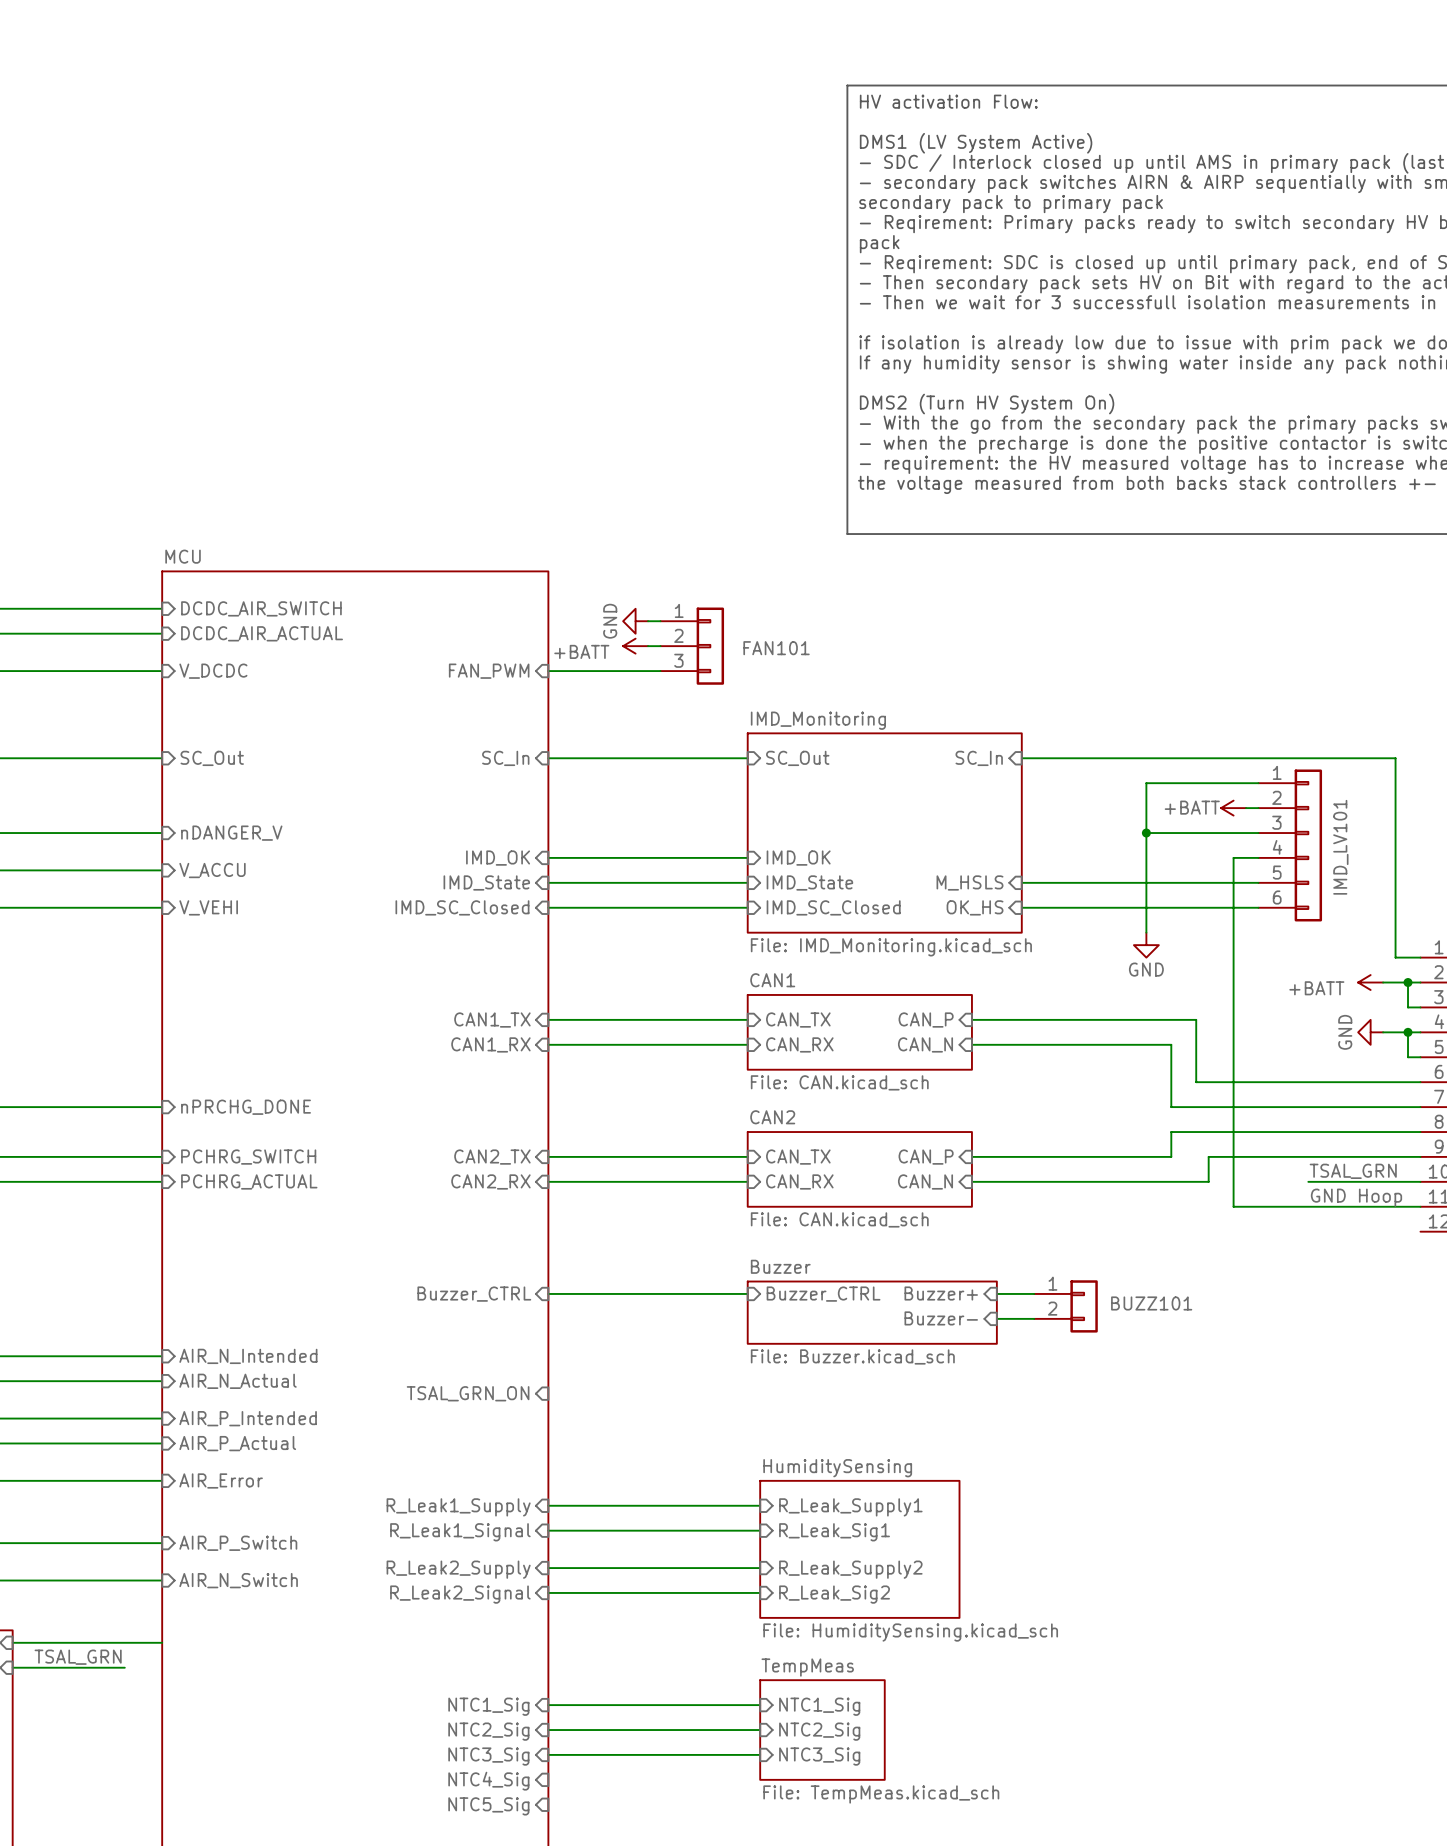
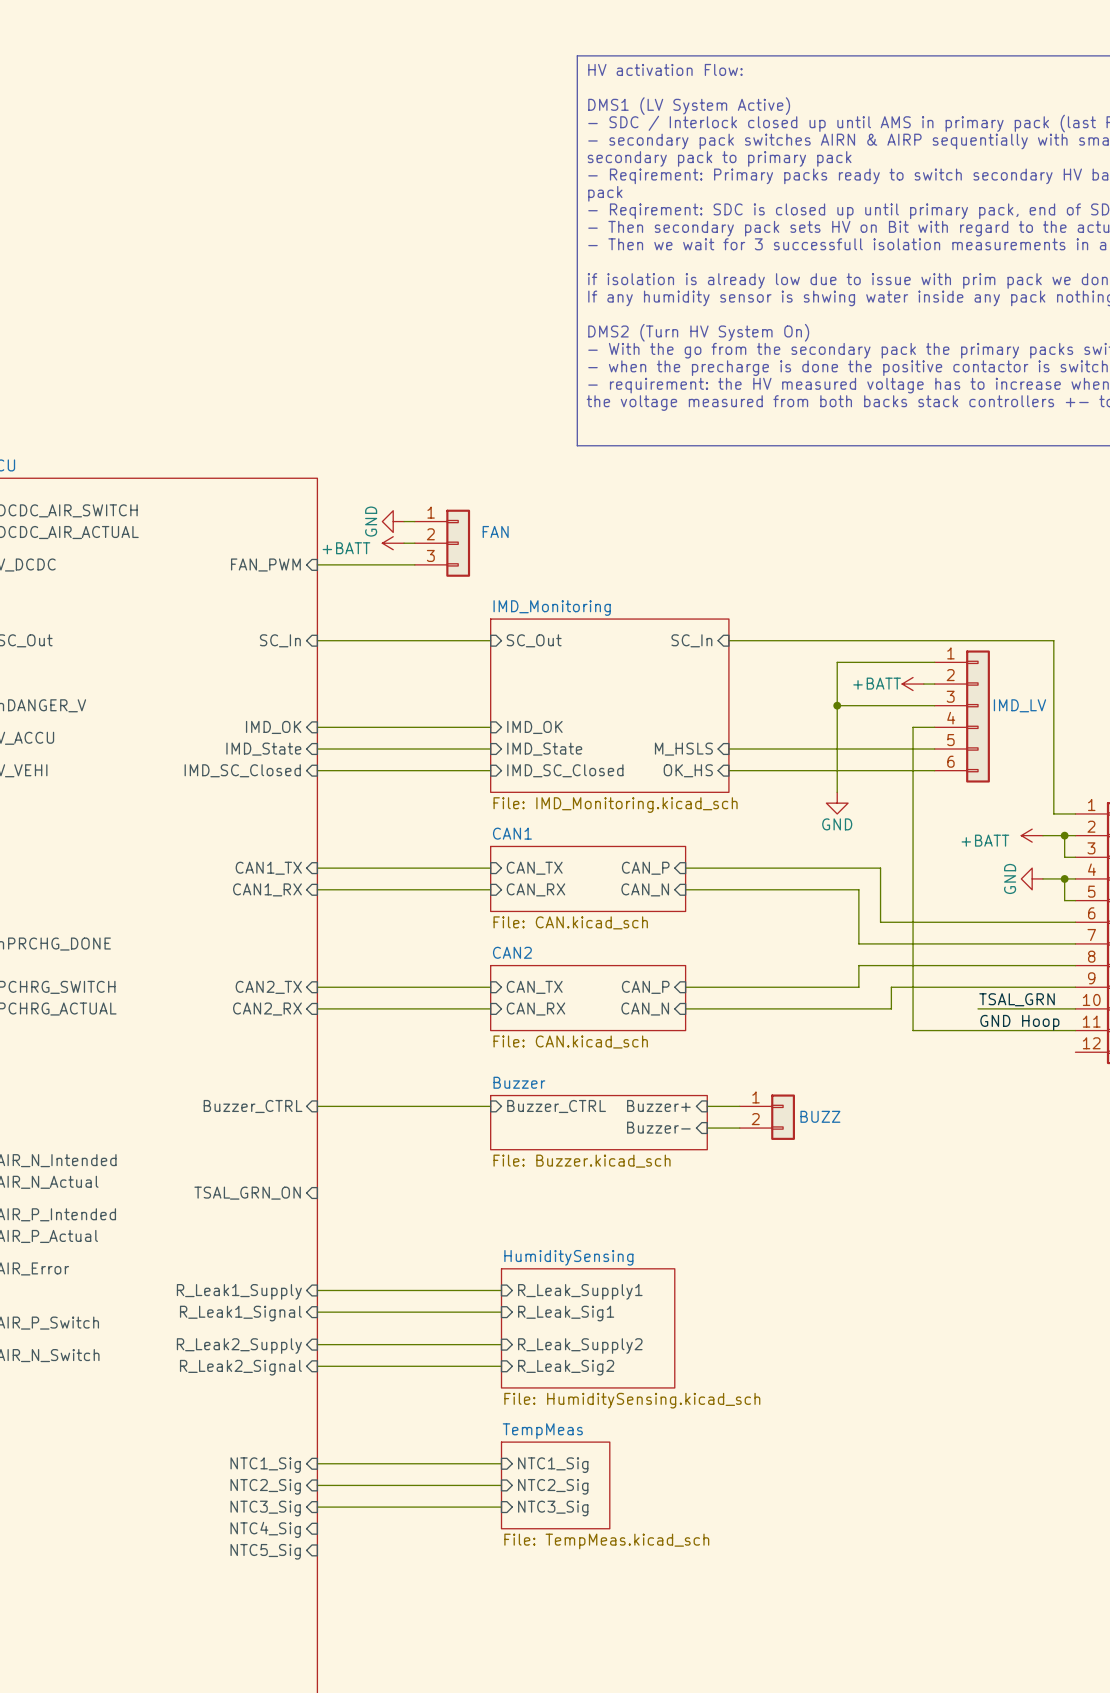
FAN101 name: FAN101 (776, 648) -> FAN (495, 531)
IMD_LV101 name: IMD_LV101 (1340, 847) -> IMD_LV (1019, 705)
BUZZ101 name: BUZZ101 (1151, 1303) -> BUZZ (820, 1116)

